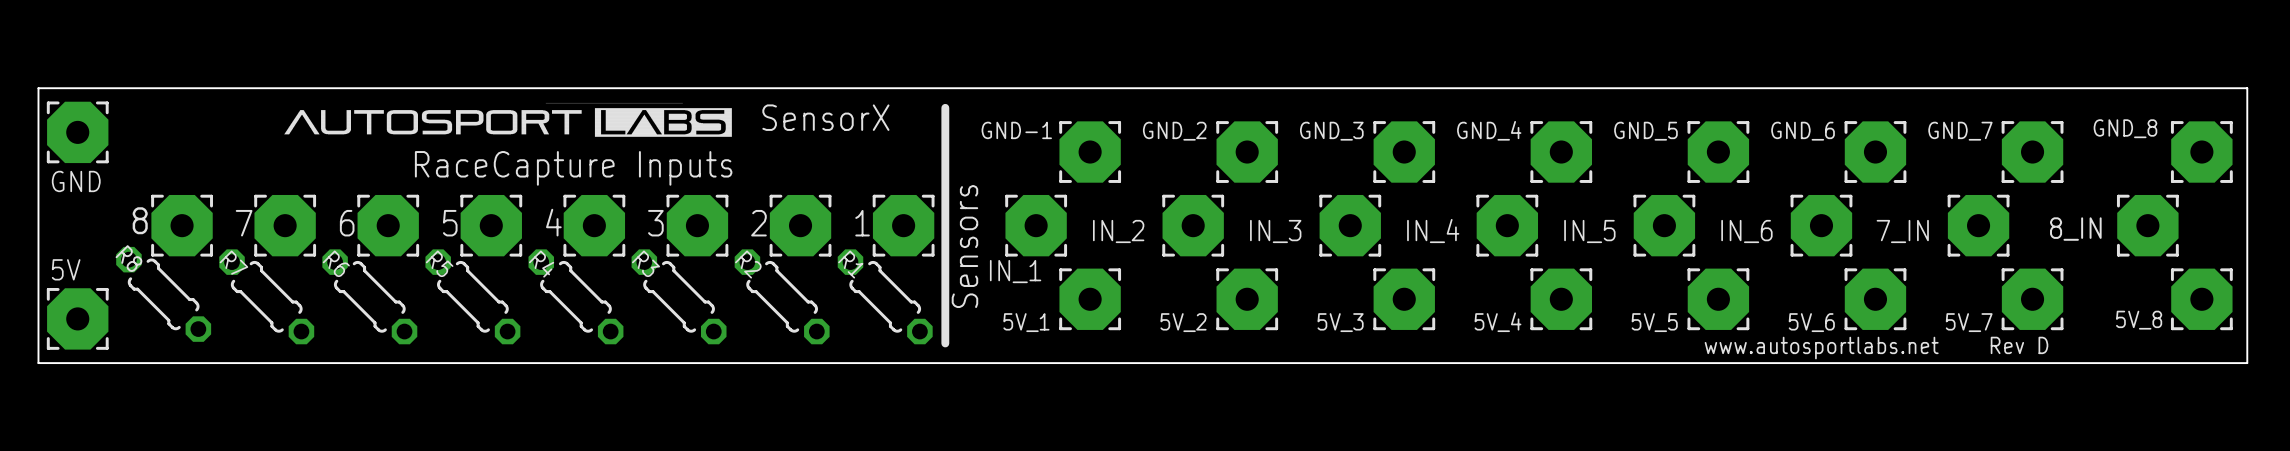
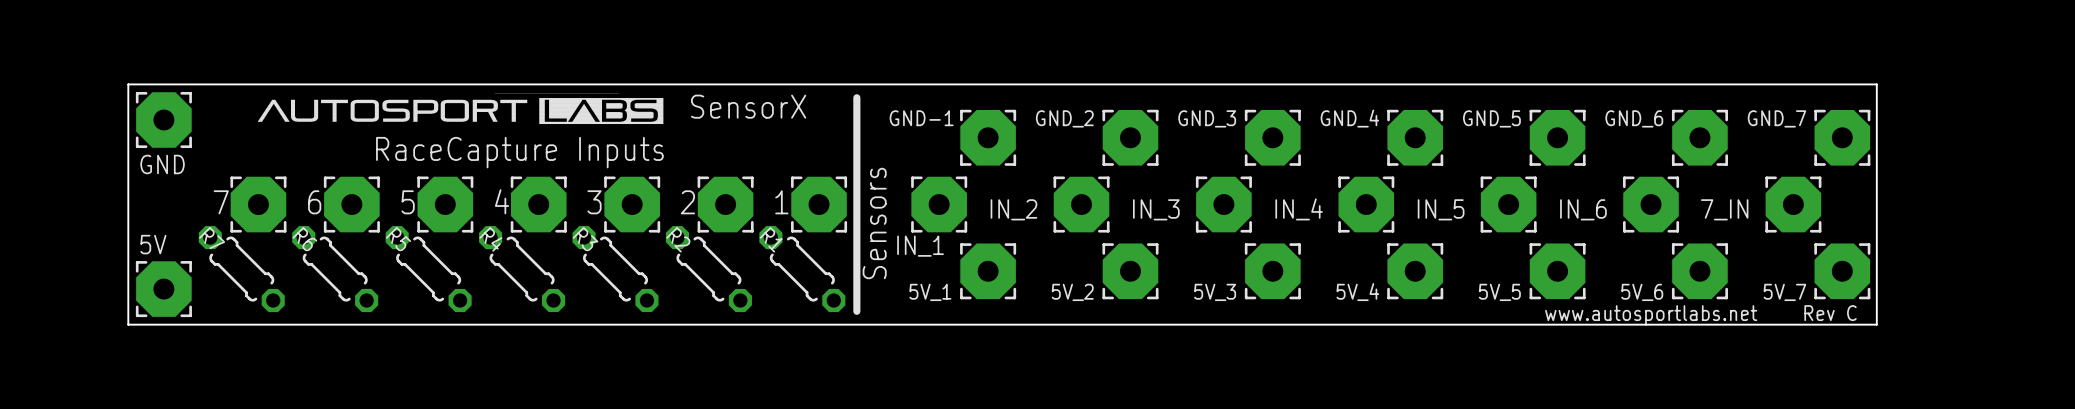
board edge: (38, 88) (38, 363) (2247, 363) (2247, 88) (38, 88) -> (128, 84) (128, 324) (1876, 324) (1876, 84) (128, 84)
GND position: (77, 132) -> (163, 120)
GND_8: (2201, 152) -> none
8: (182, 225) -> none
8_IN: (2147, 225) -> none
R8: (163, 294) -> none
5V_8: (2201, 299) -> none
5V position: (77, 318) -> (163, 289)
text: Rev D (2019, 345) -> Rev C (1830, 313)

